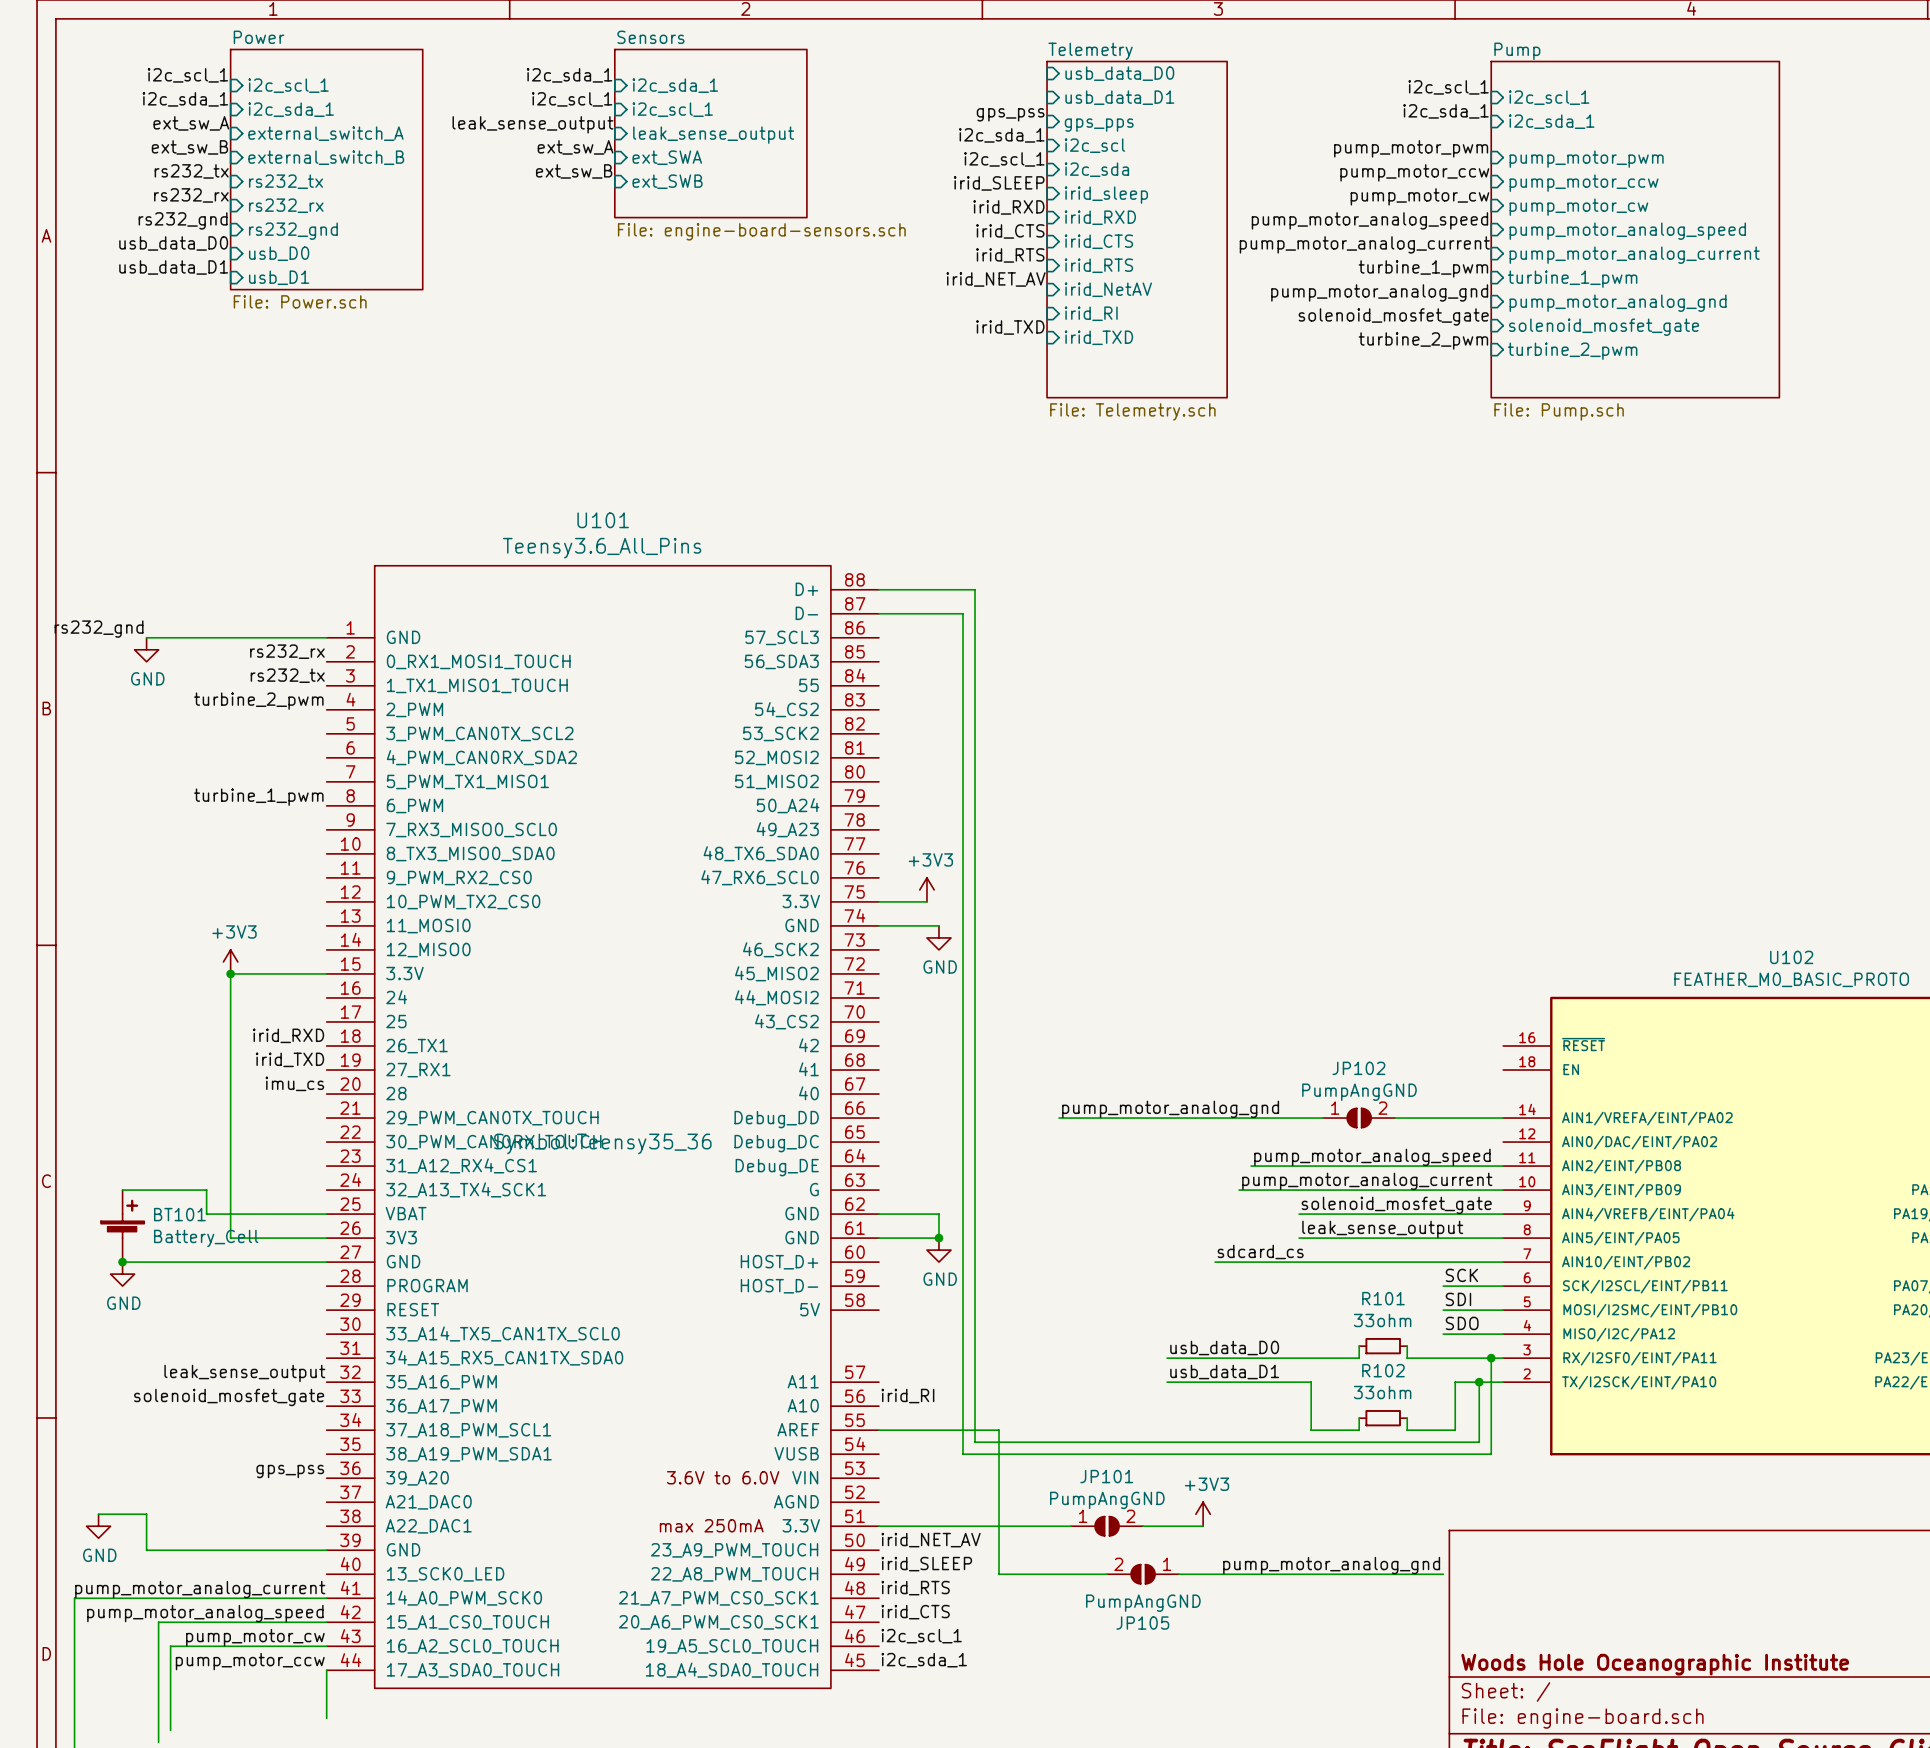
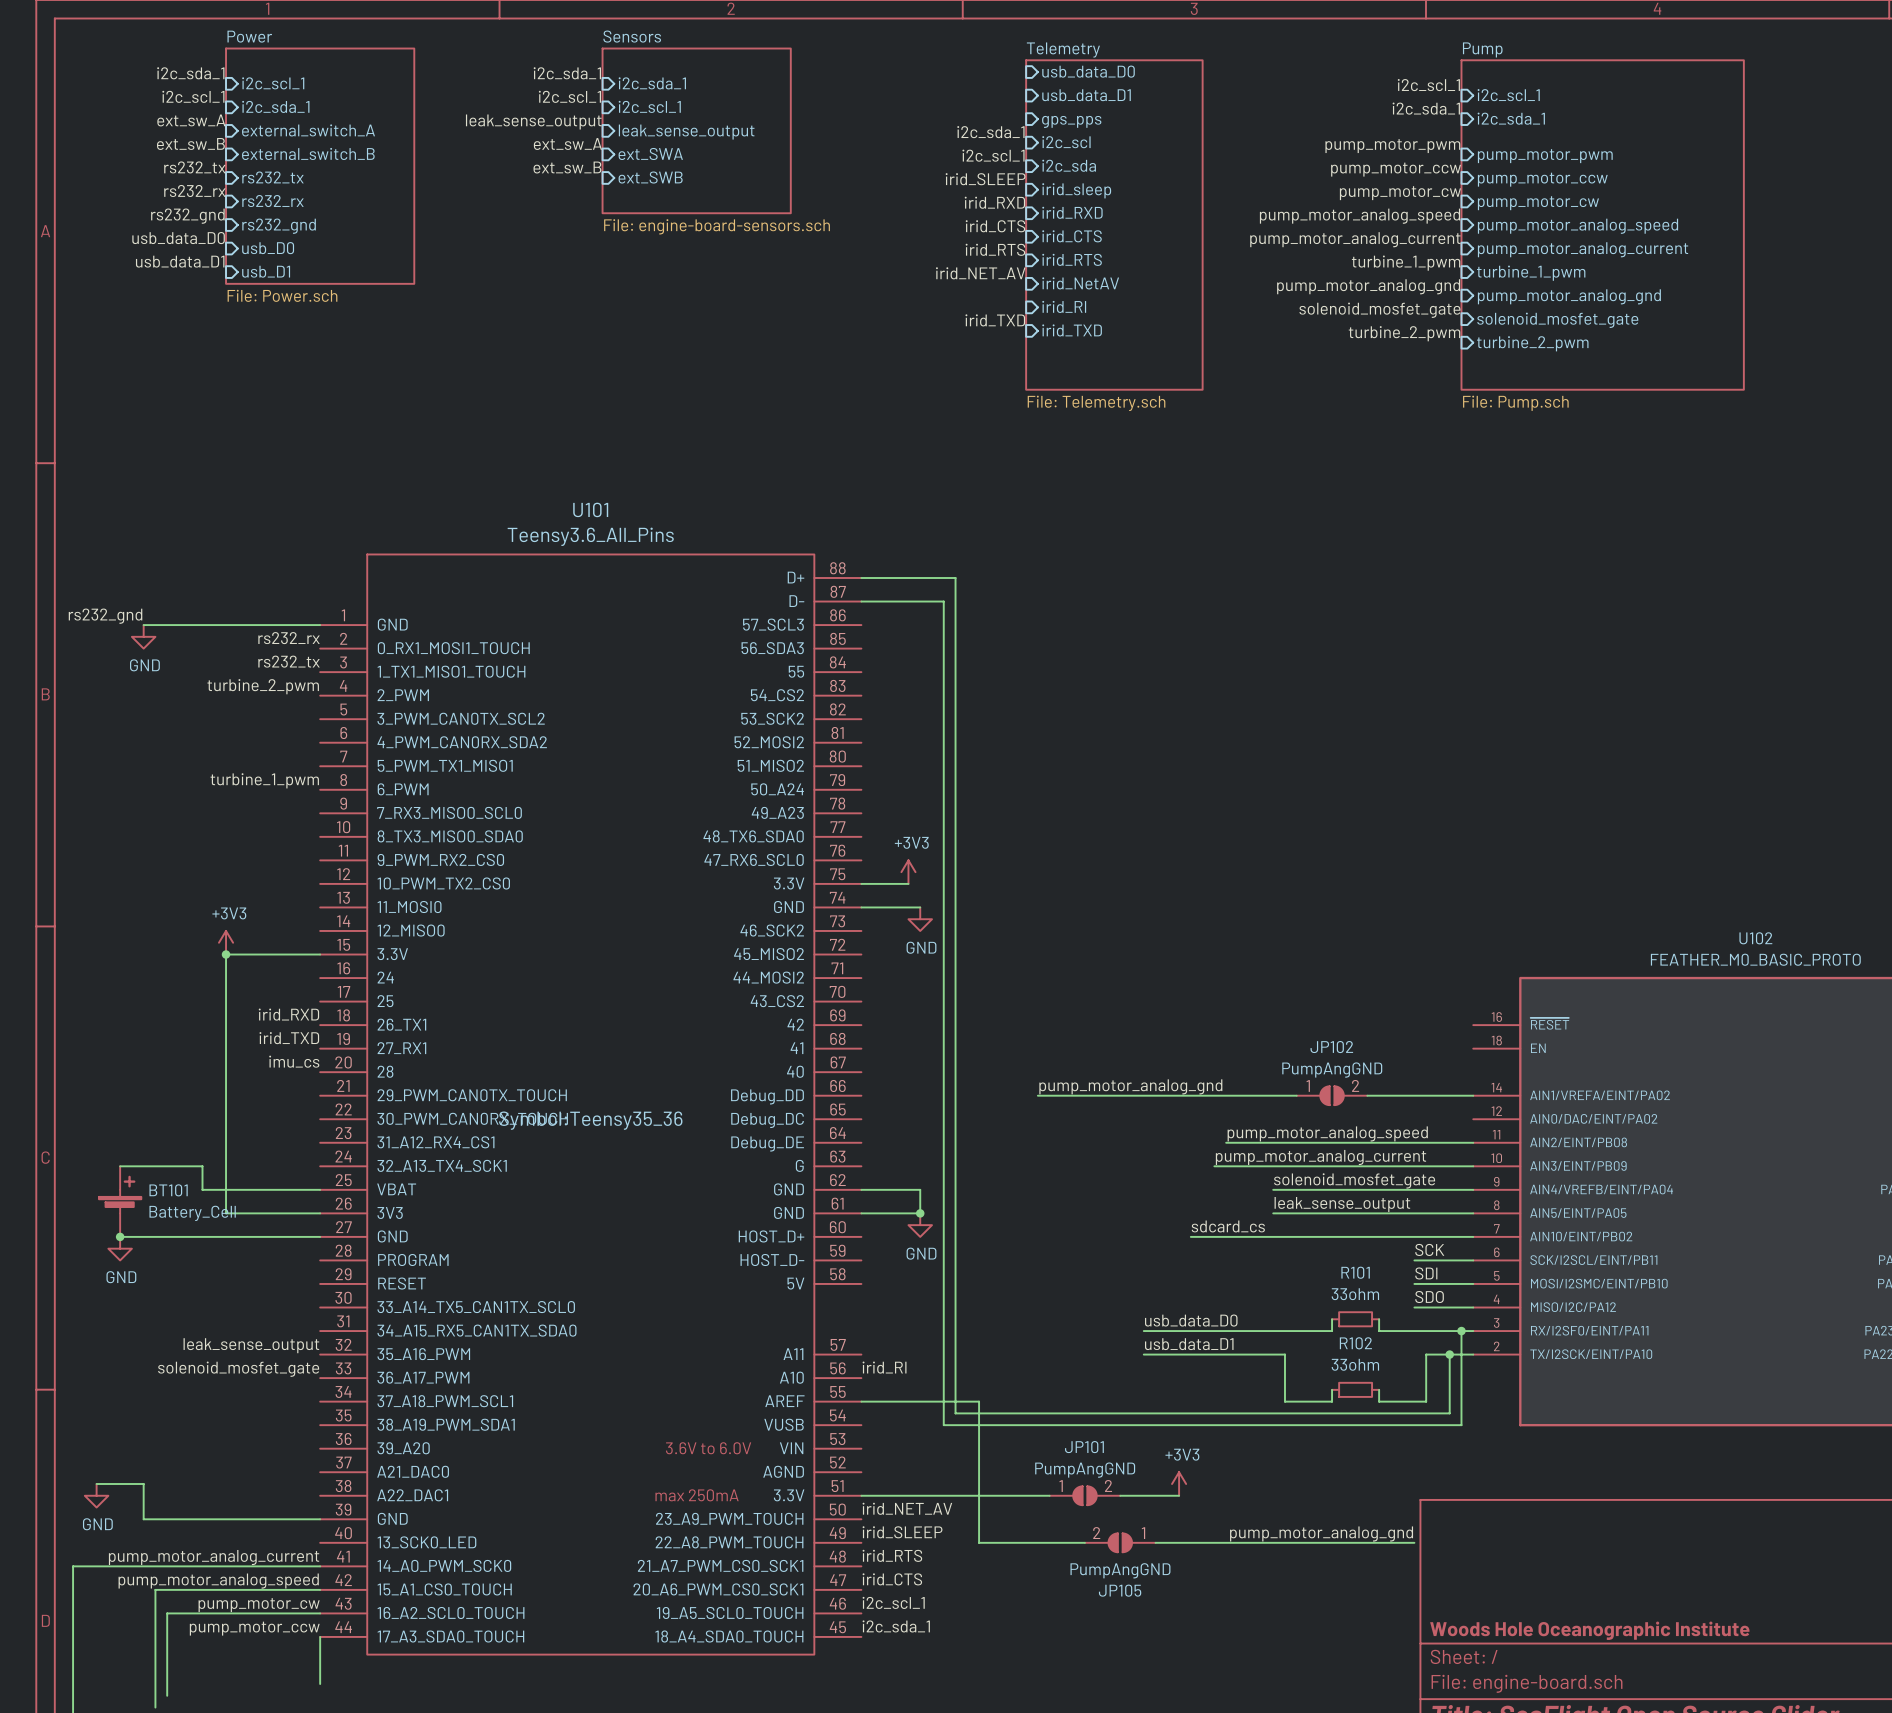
label: i2c_scl_1 (187, 75) -> i2c_sda_1 (190, 73)
label: i2c_sda_1 (185, 99) -> i2c_scl_1 (193, 96)
label: gps_pss (1010, 114) -> none
label: gps_pss (290, 1471) -> none

